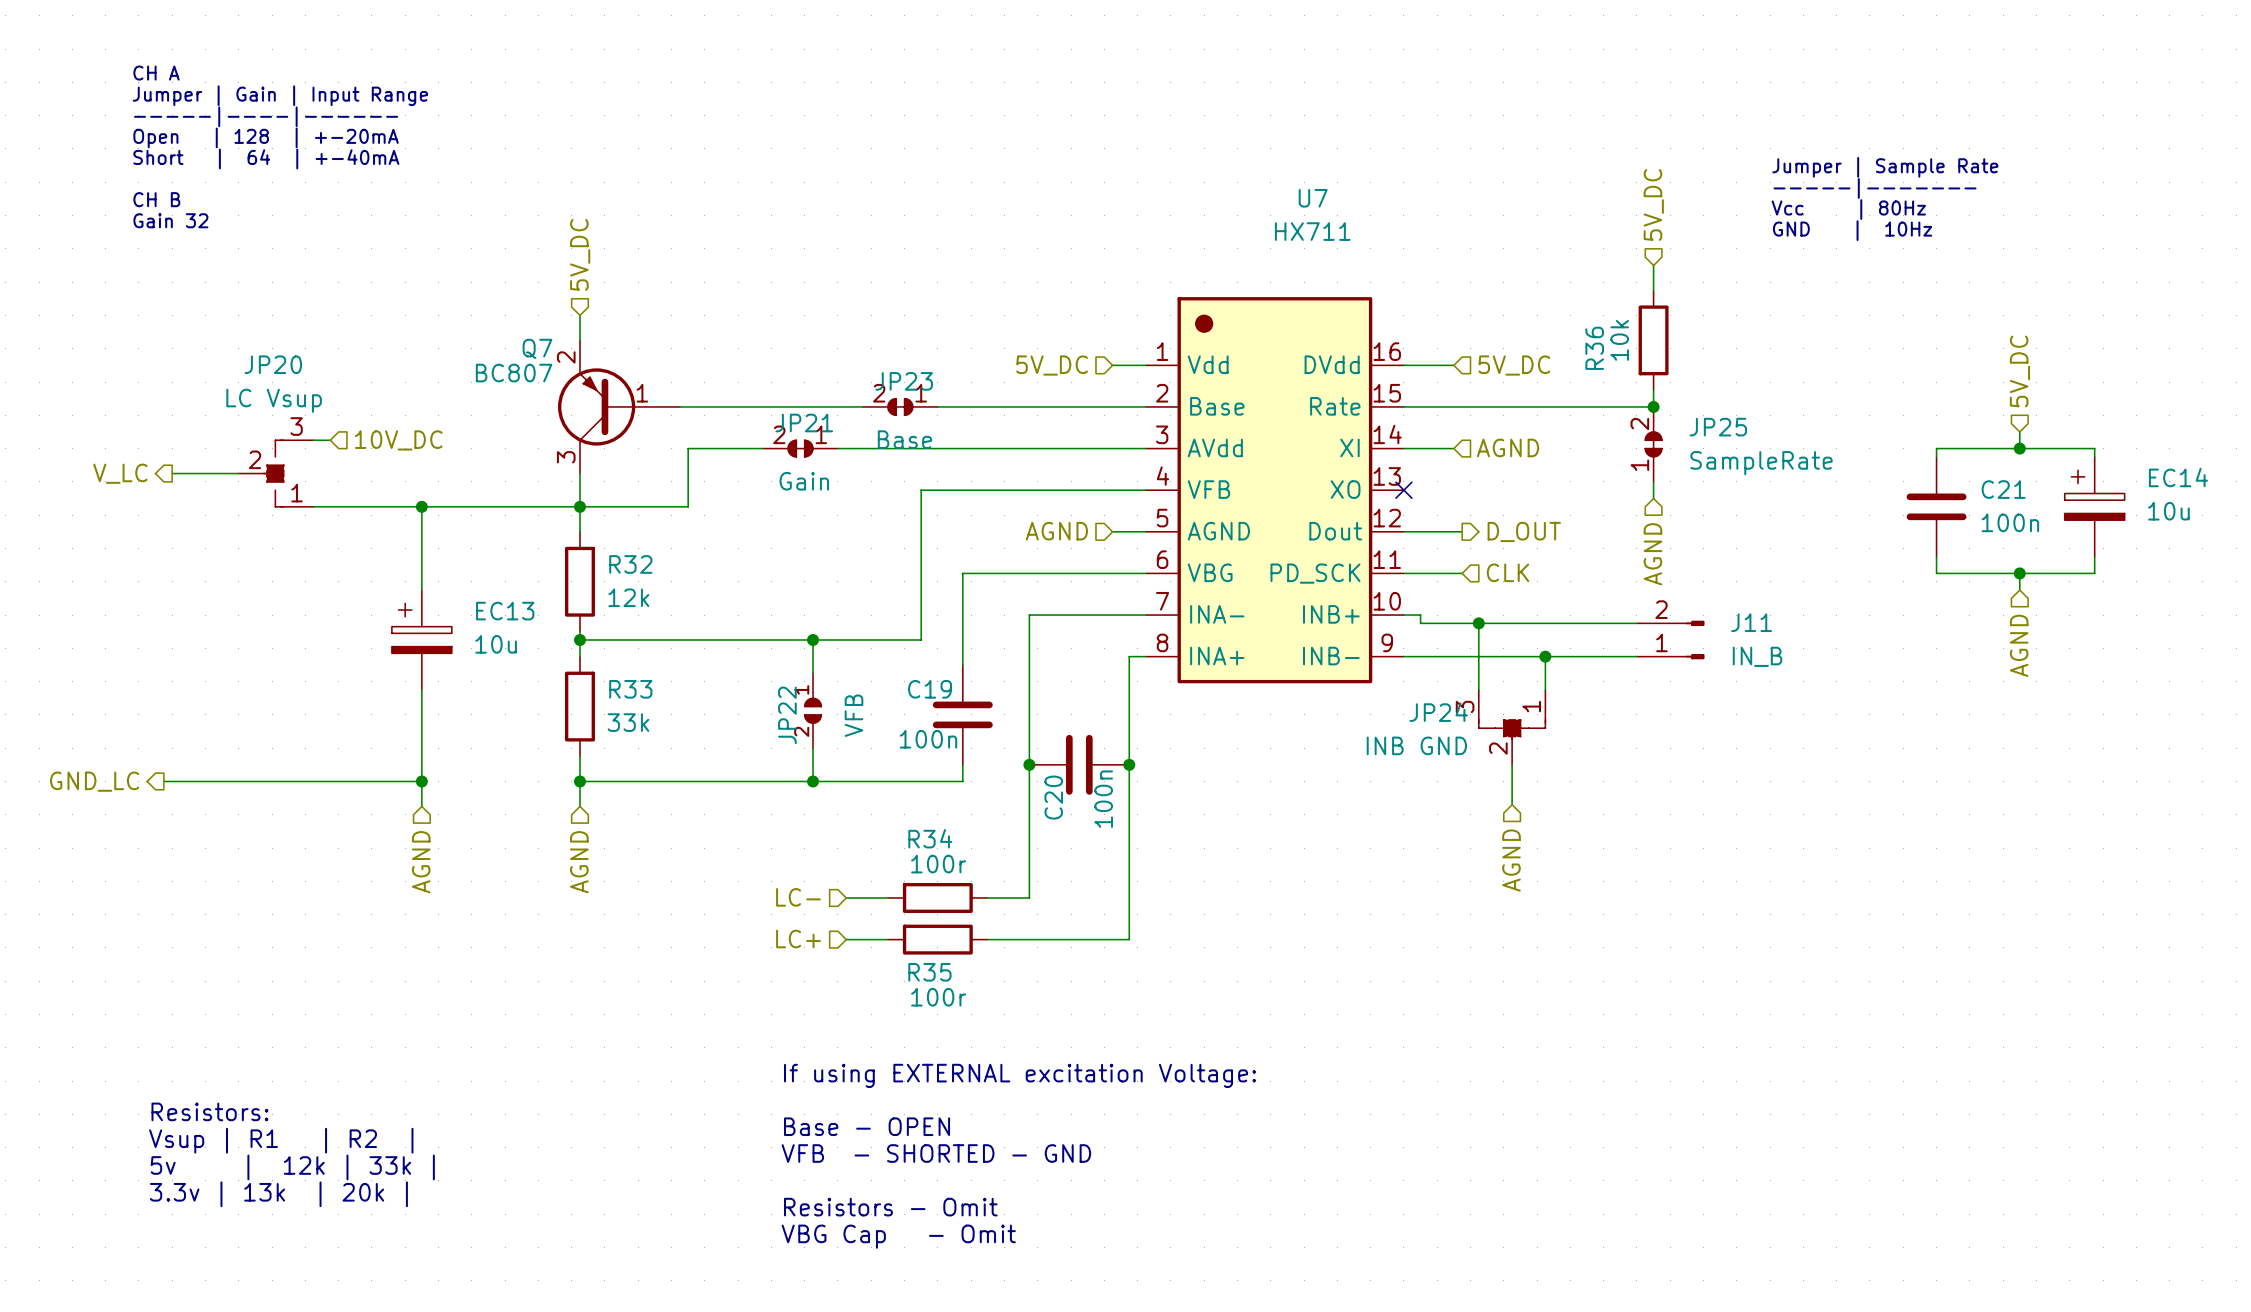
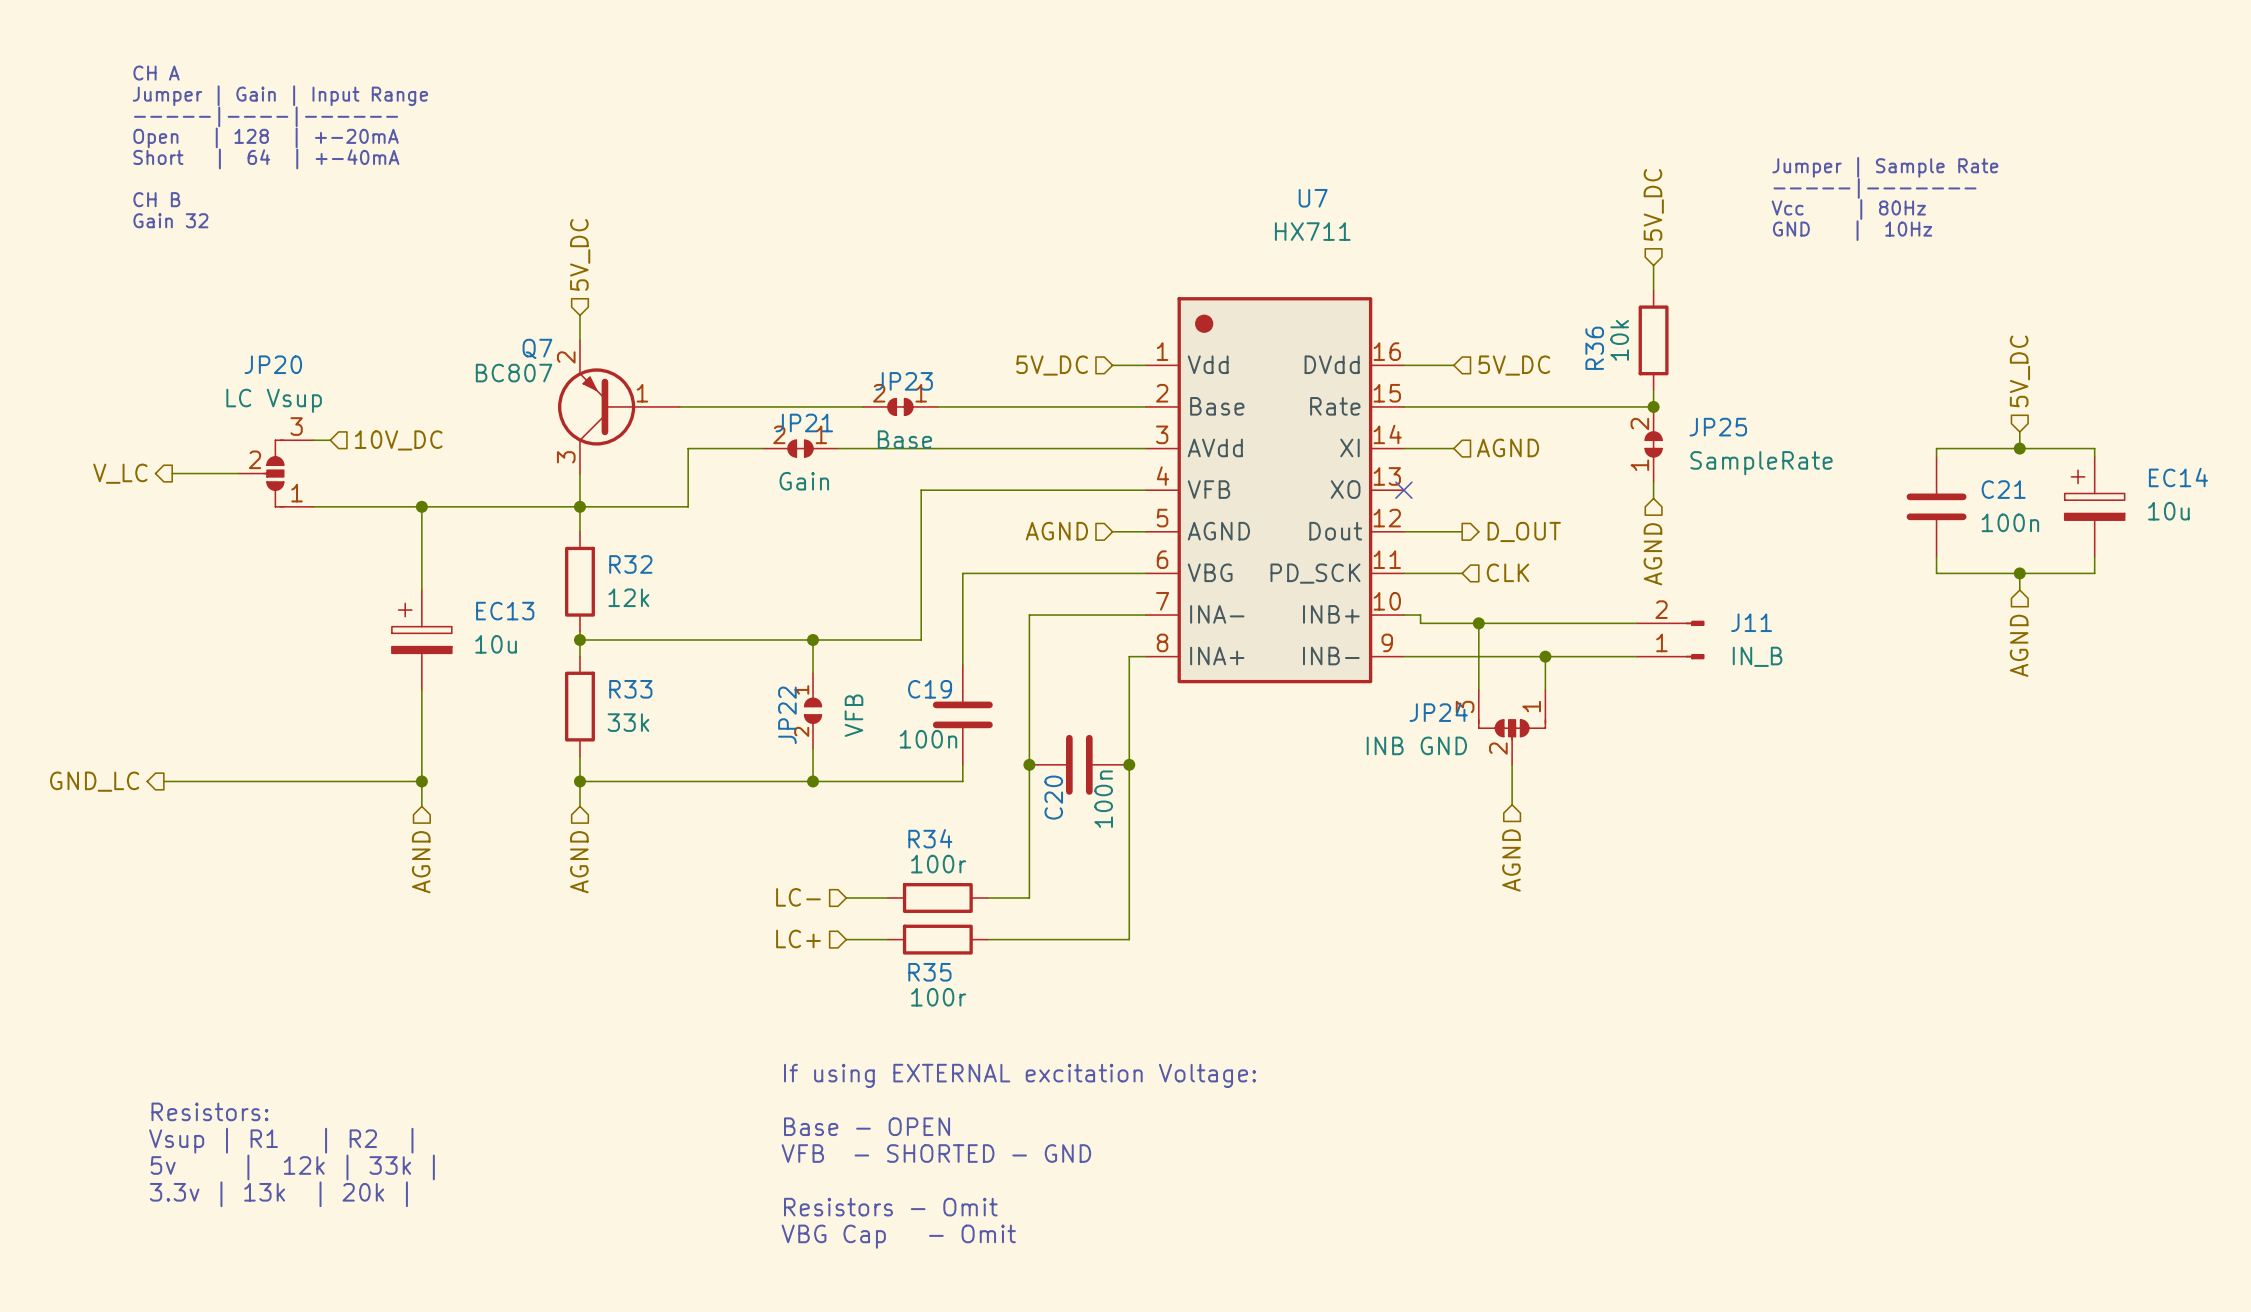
JP20 symbol: [238, 440, 314, 507] -> [238, 440, 314, 507]
JP24 symbol: [1478, 689, 1546, 765] -> [1478, 689, 1546, 765]

